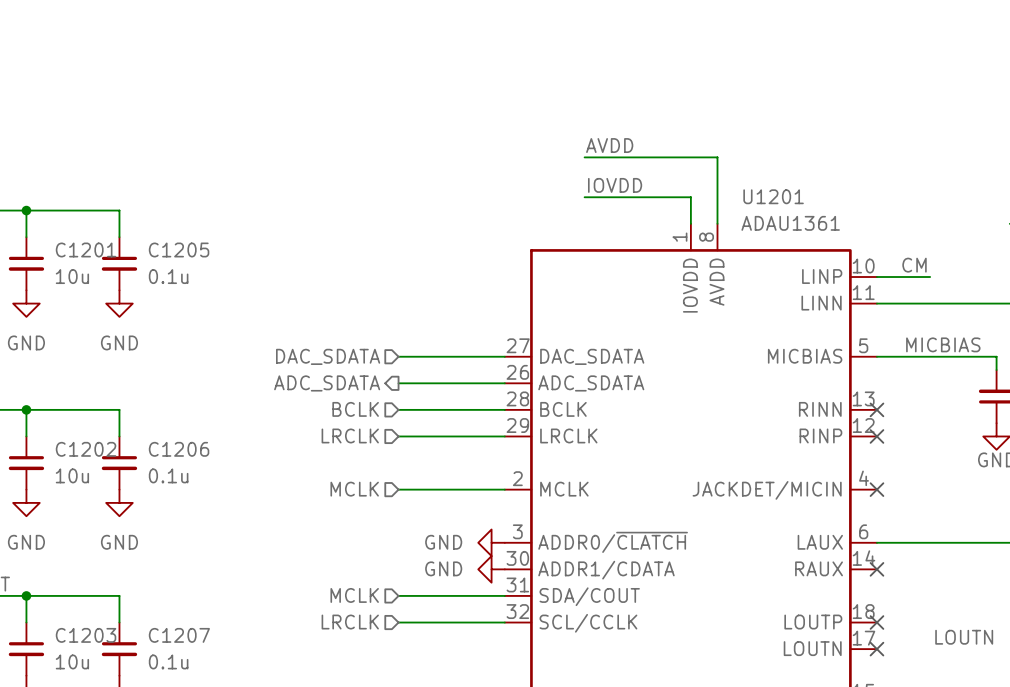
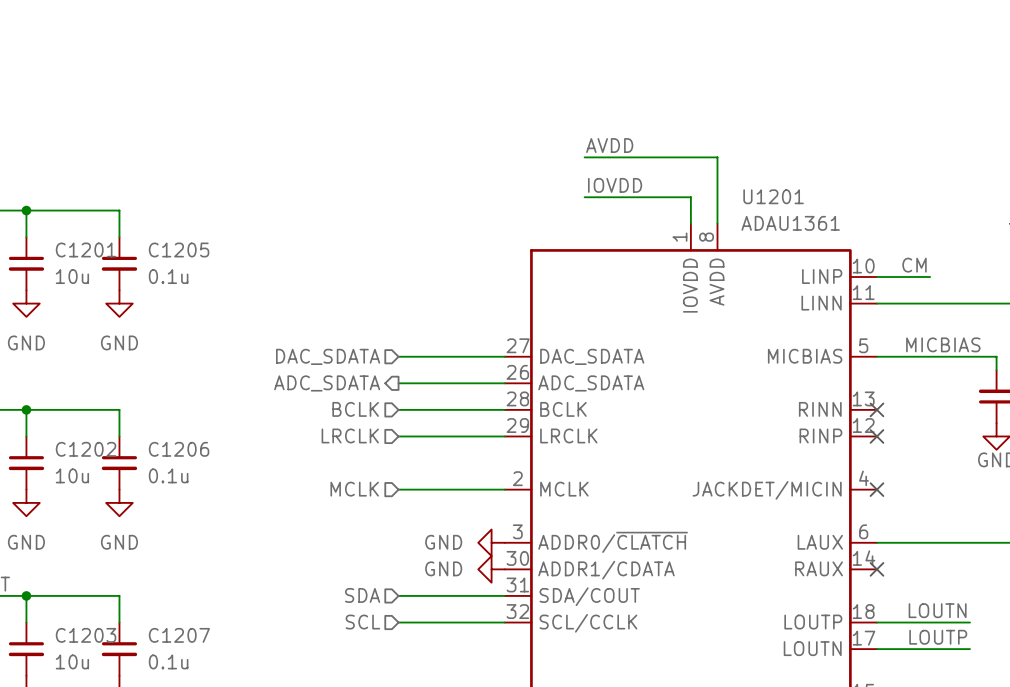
hierarchical label: MCLK (354, 595) -> SDA (362, 595)
hierarchical label: LRCLK (350, 622) -> SCL (362, 622)
wire: none -> (876, 622) (969, 622)
no-connect mark: (876, 622) -> none
label: none -> LOUTP (938, 637)
label position: LOUTN (964, 637) -> LOUTN (937, 610)
wire: none -> (876, 649) (969, 649)
no-connect mark: (876, 649) -> none

